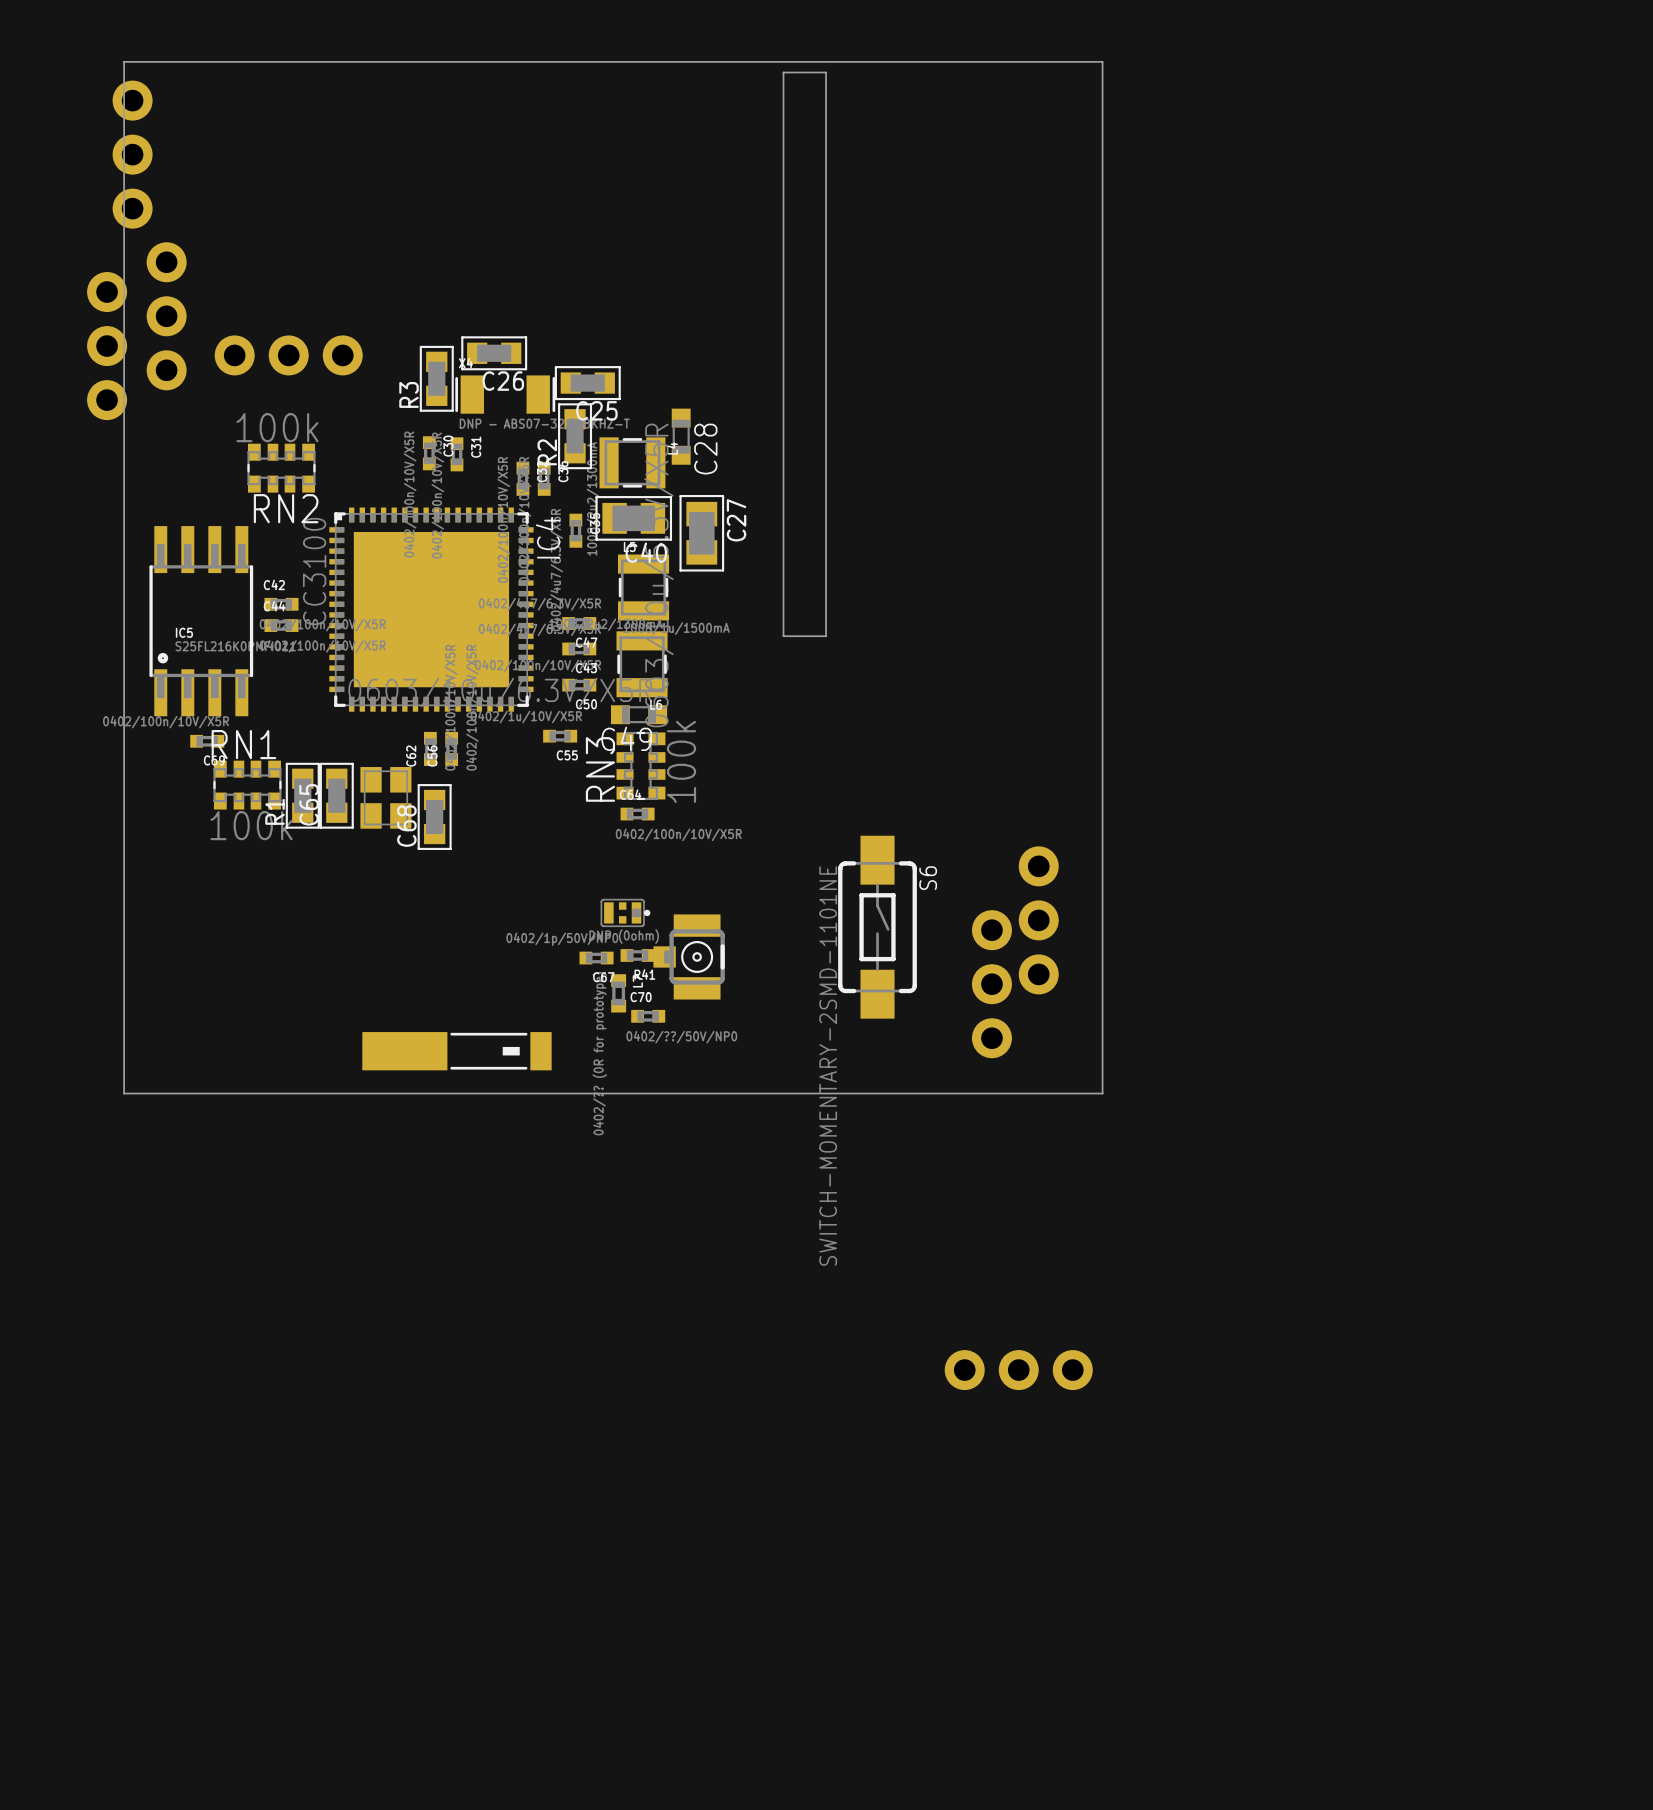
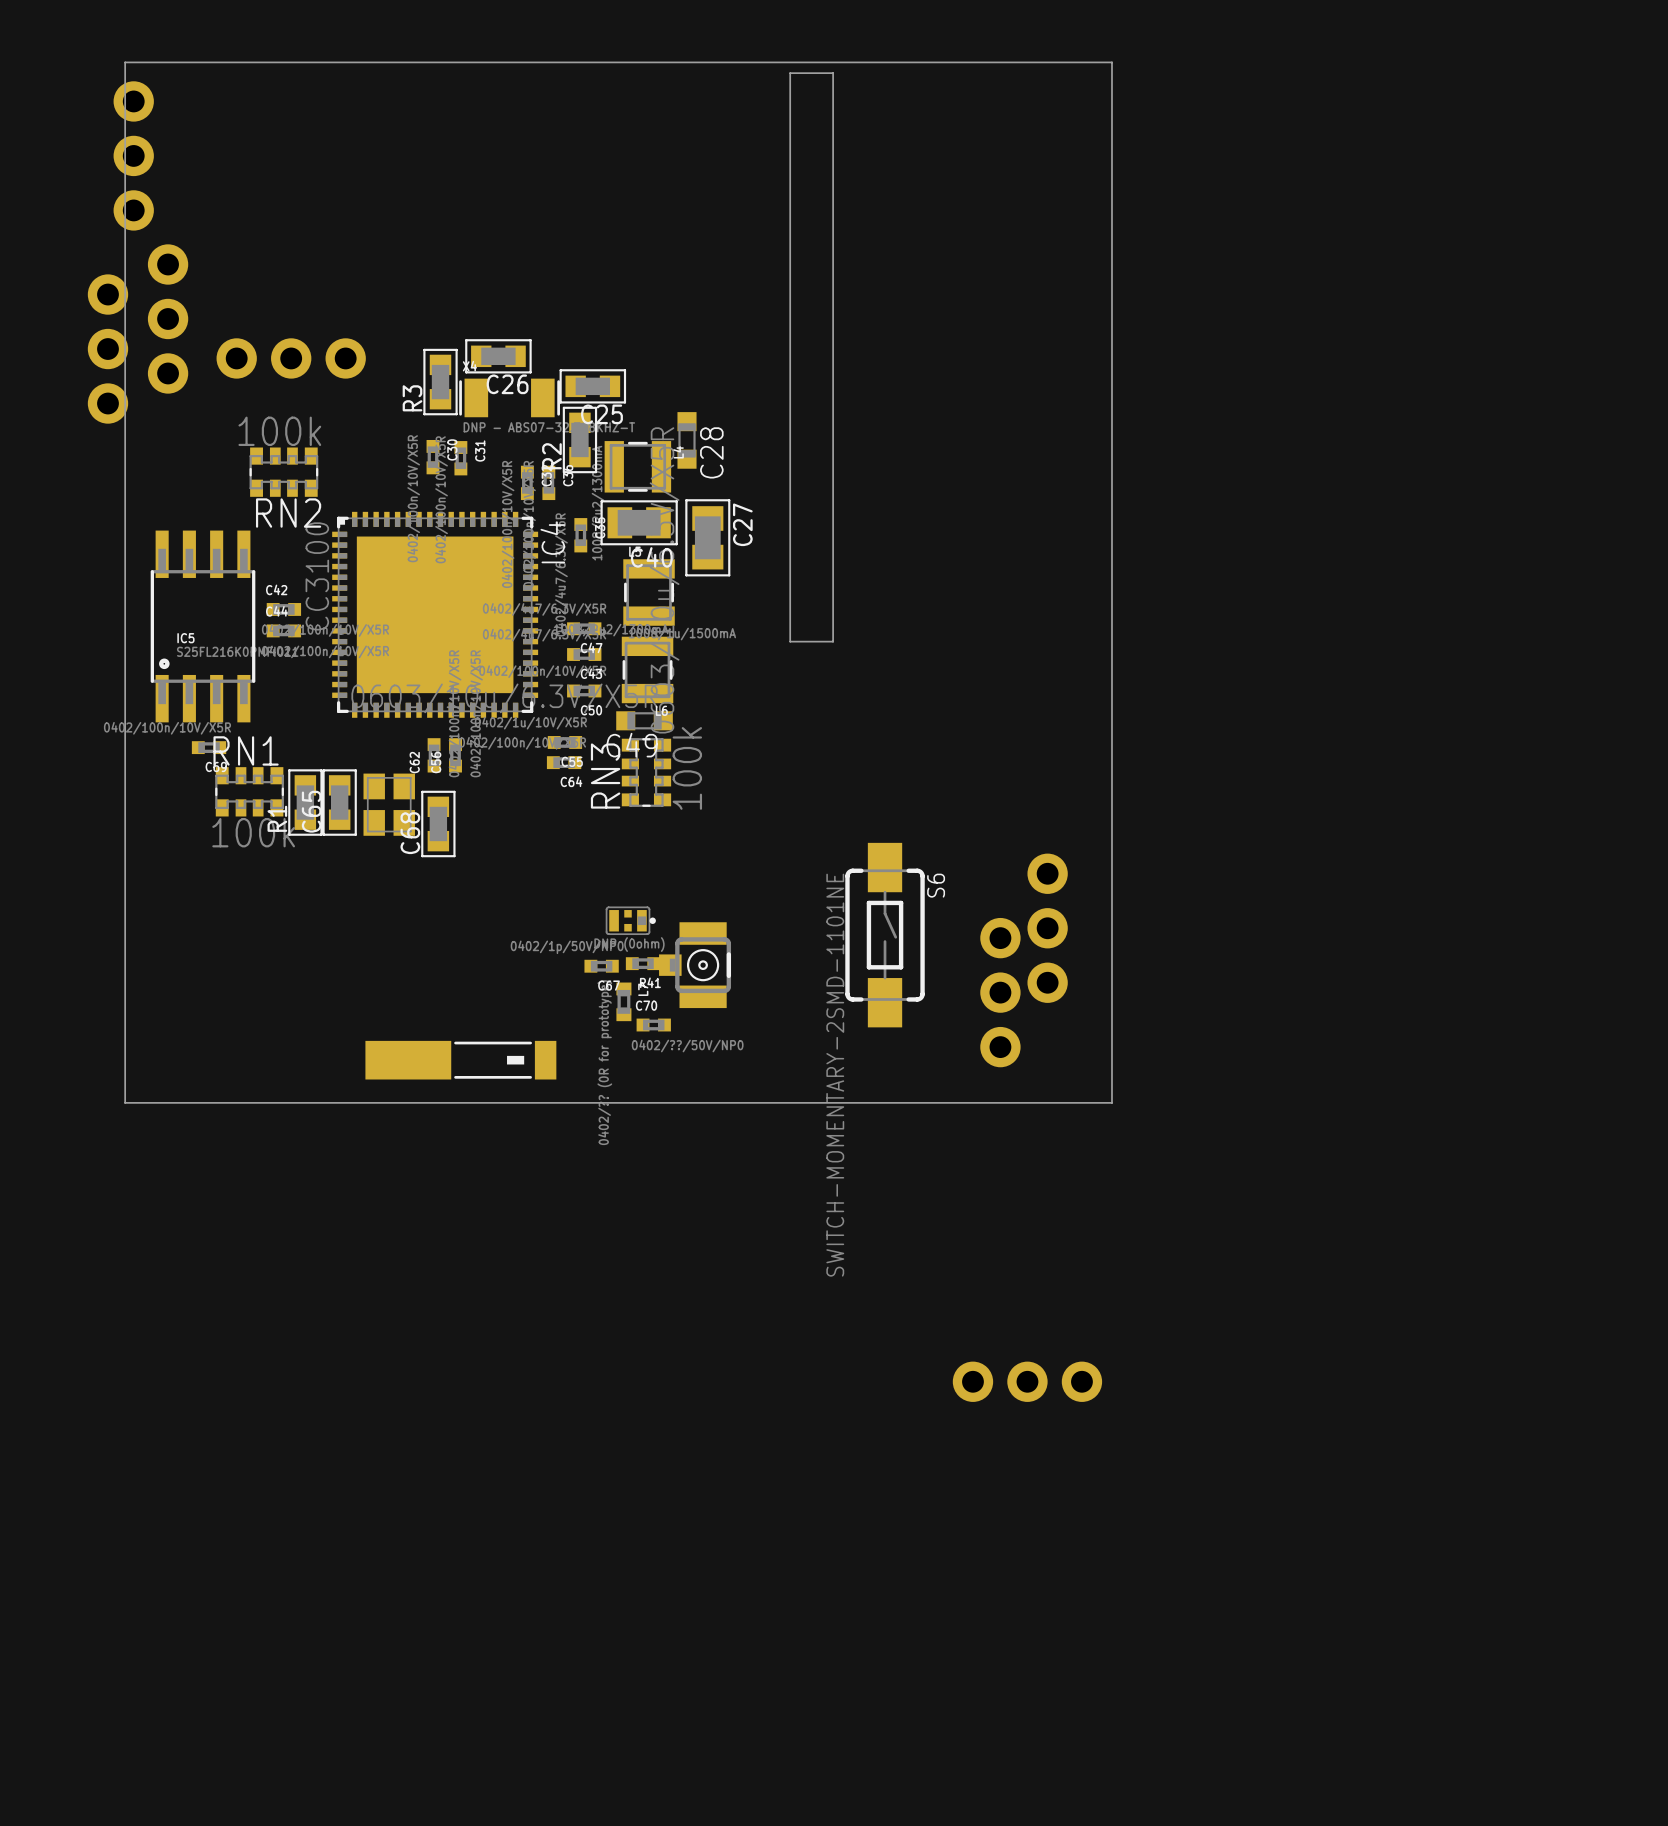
C64 rotation: 0° (637, 814) -> 180° (564, 762)
C64 position: (637, 814) -> (564, 762)

